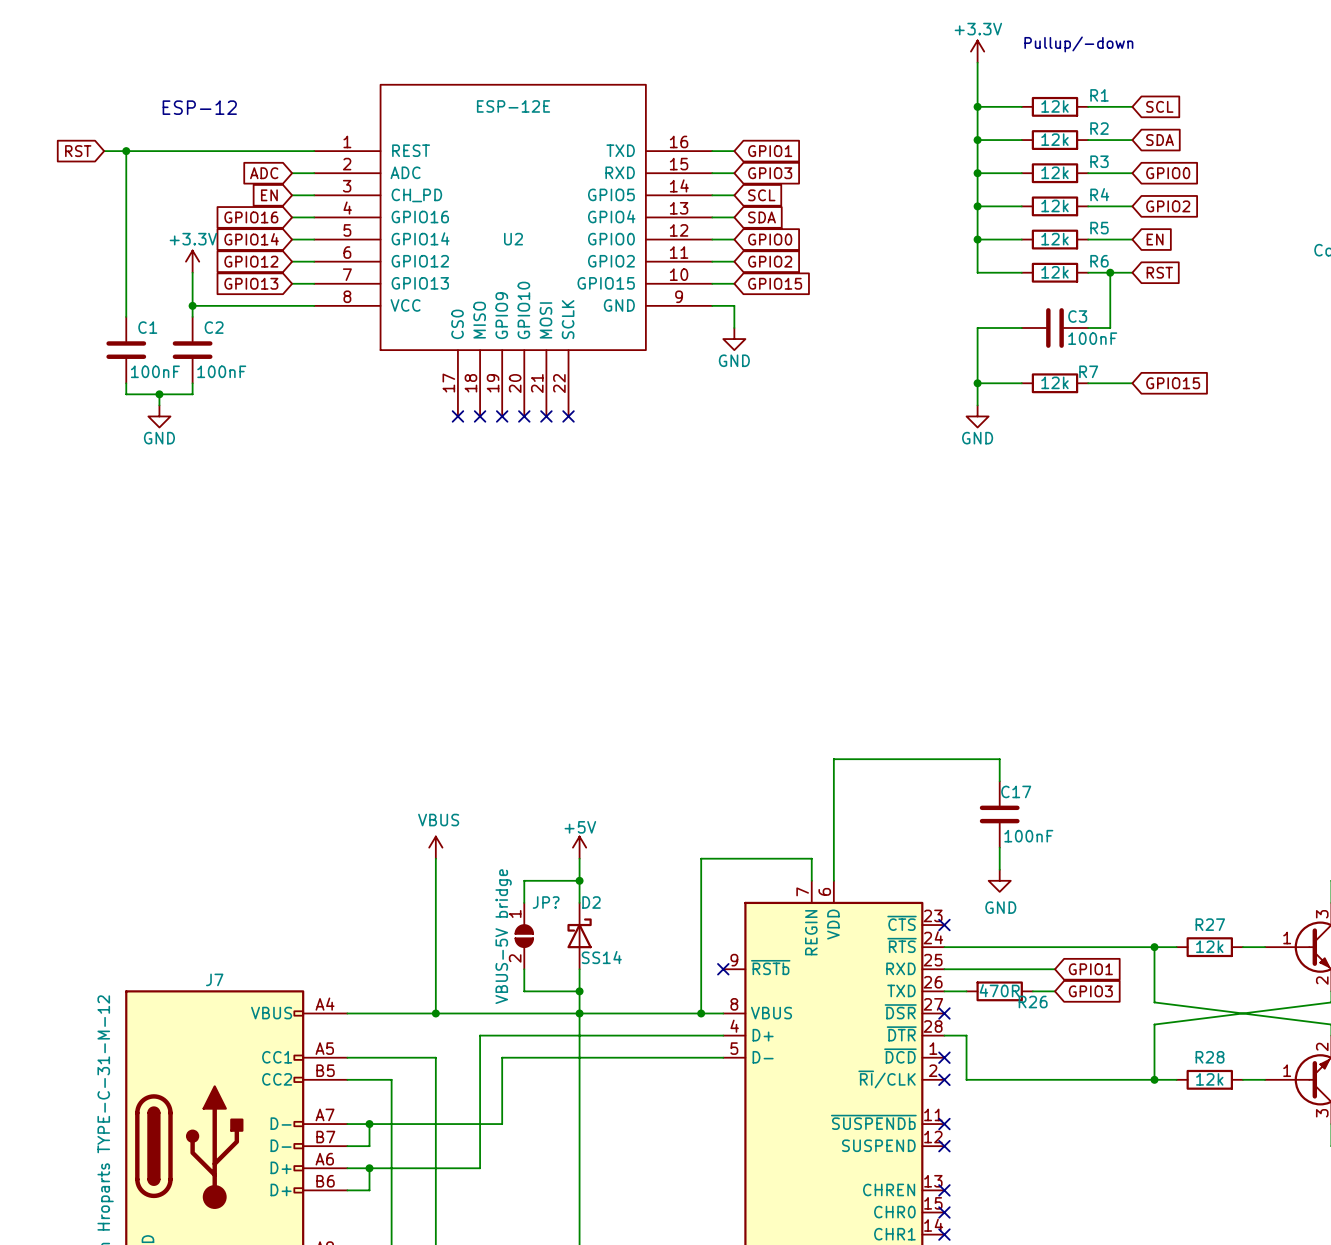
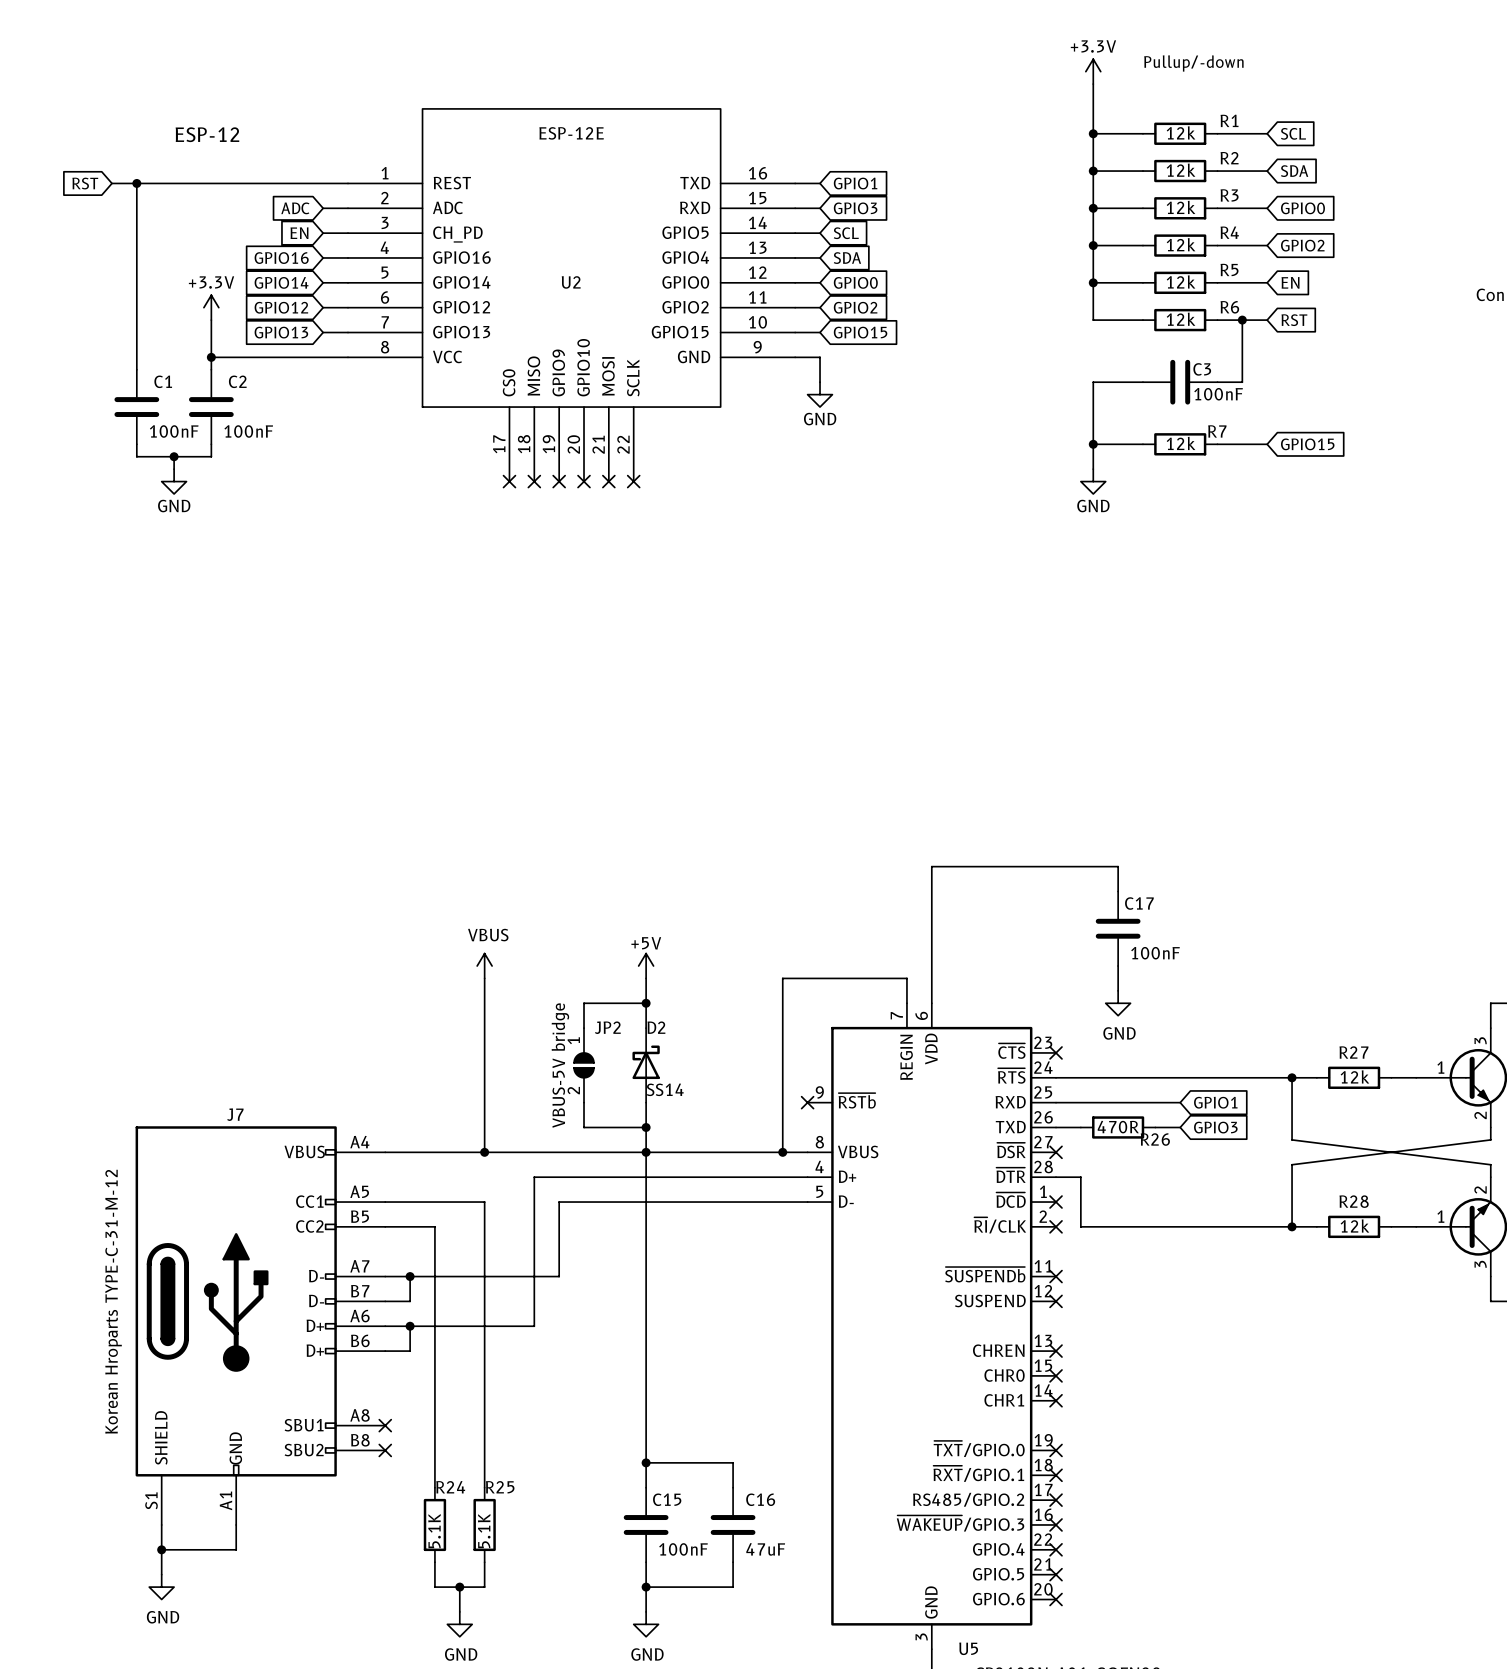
JP? name: JP? (546, 902) -> JP2 (607, 1027)

